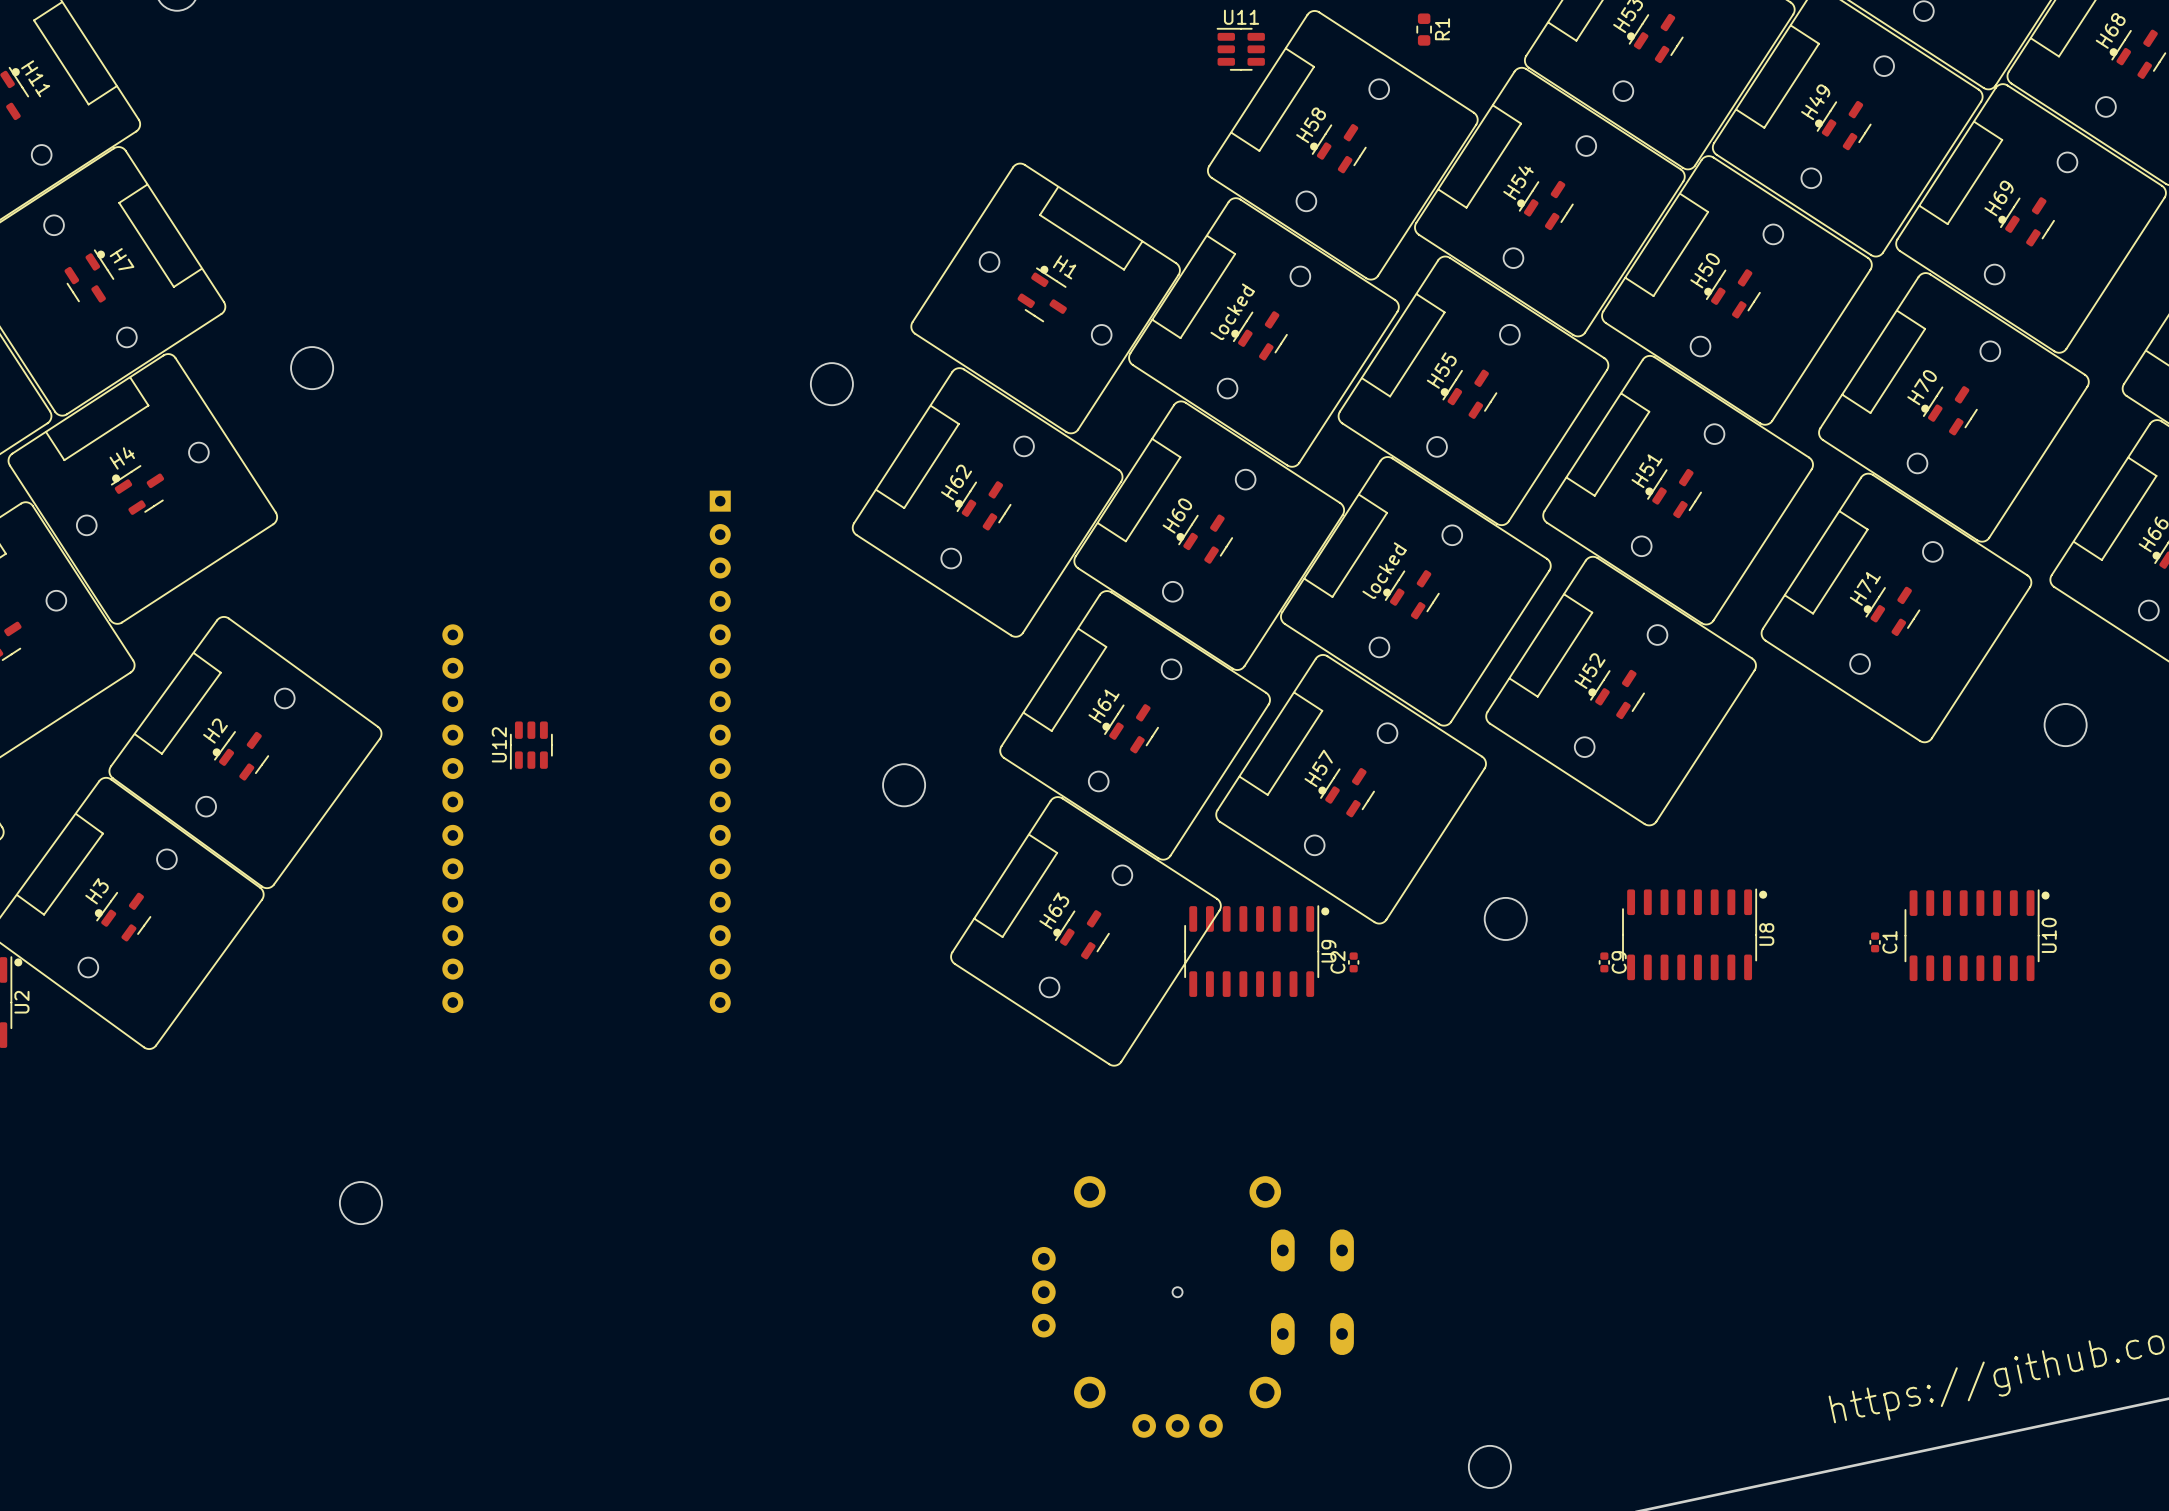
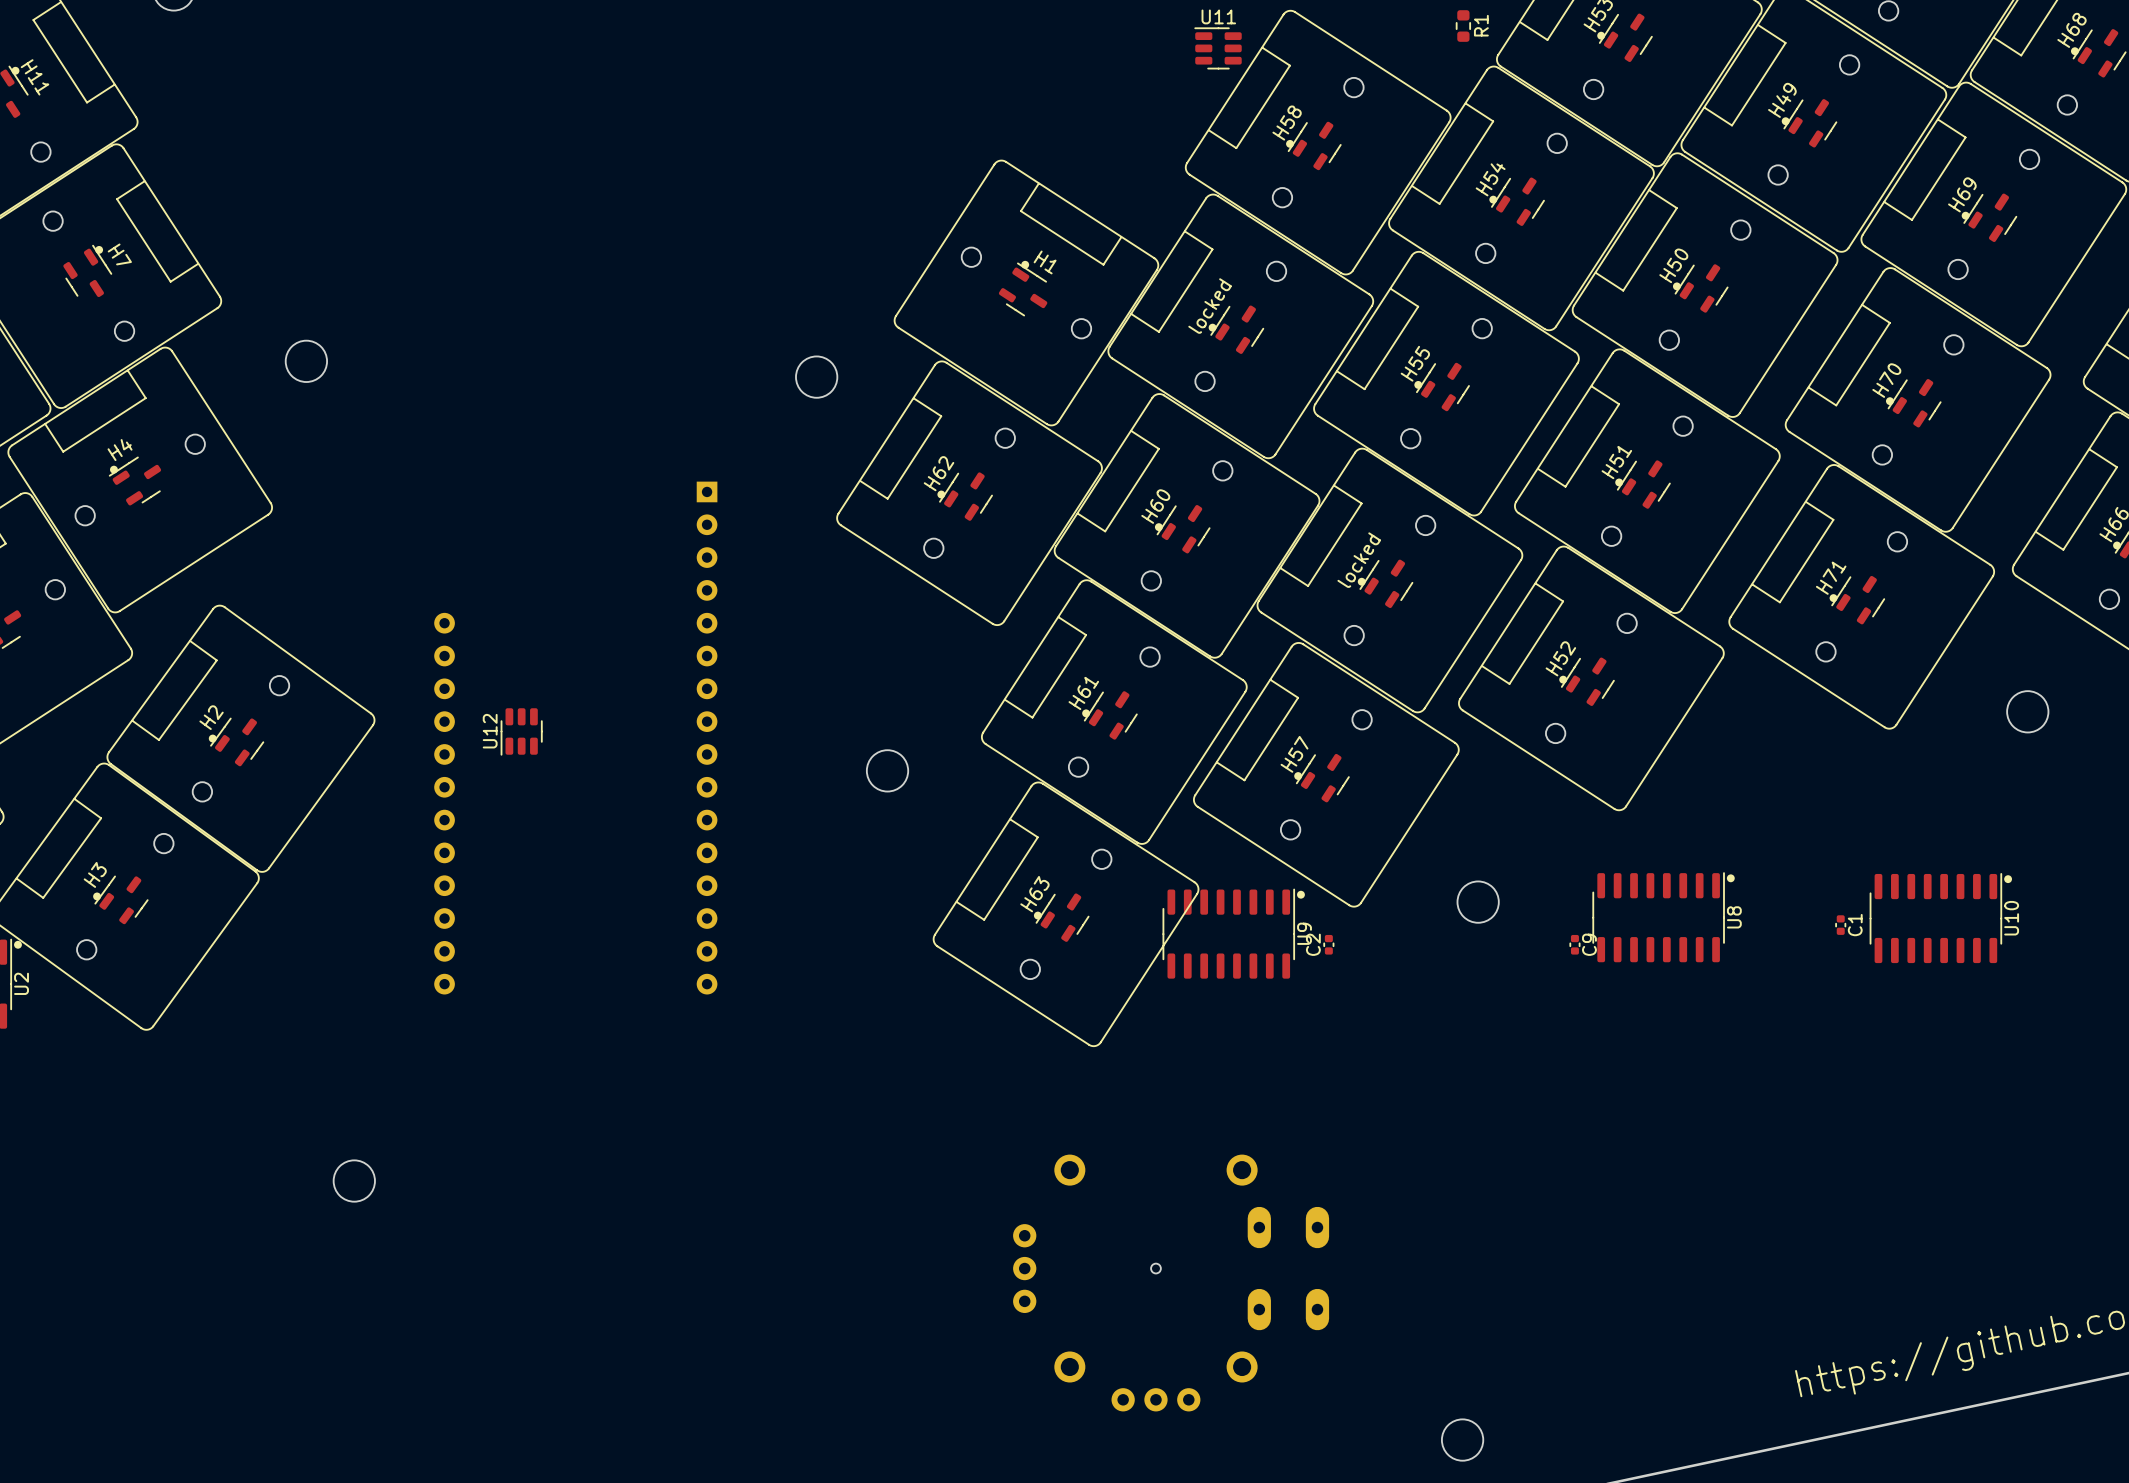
R1 position: (1424, 29) -> (1463, 26)

